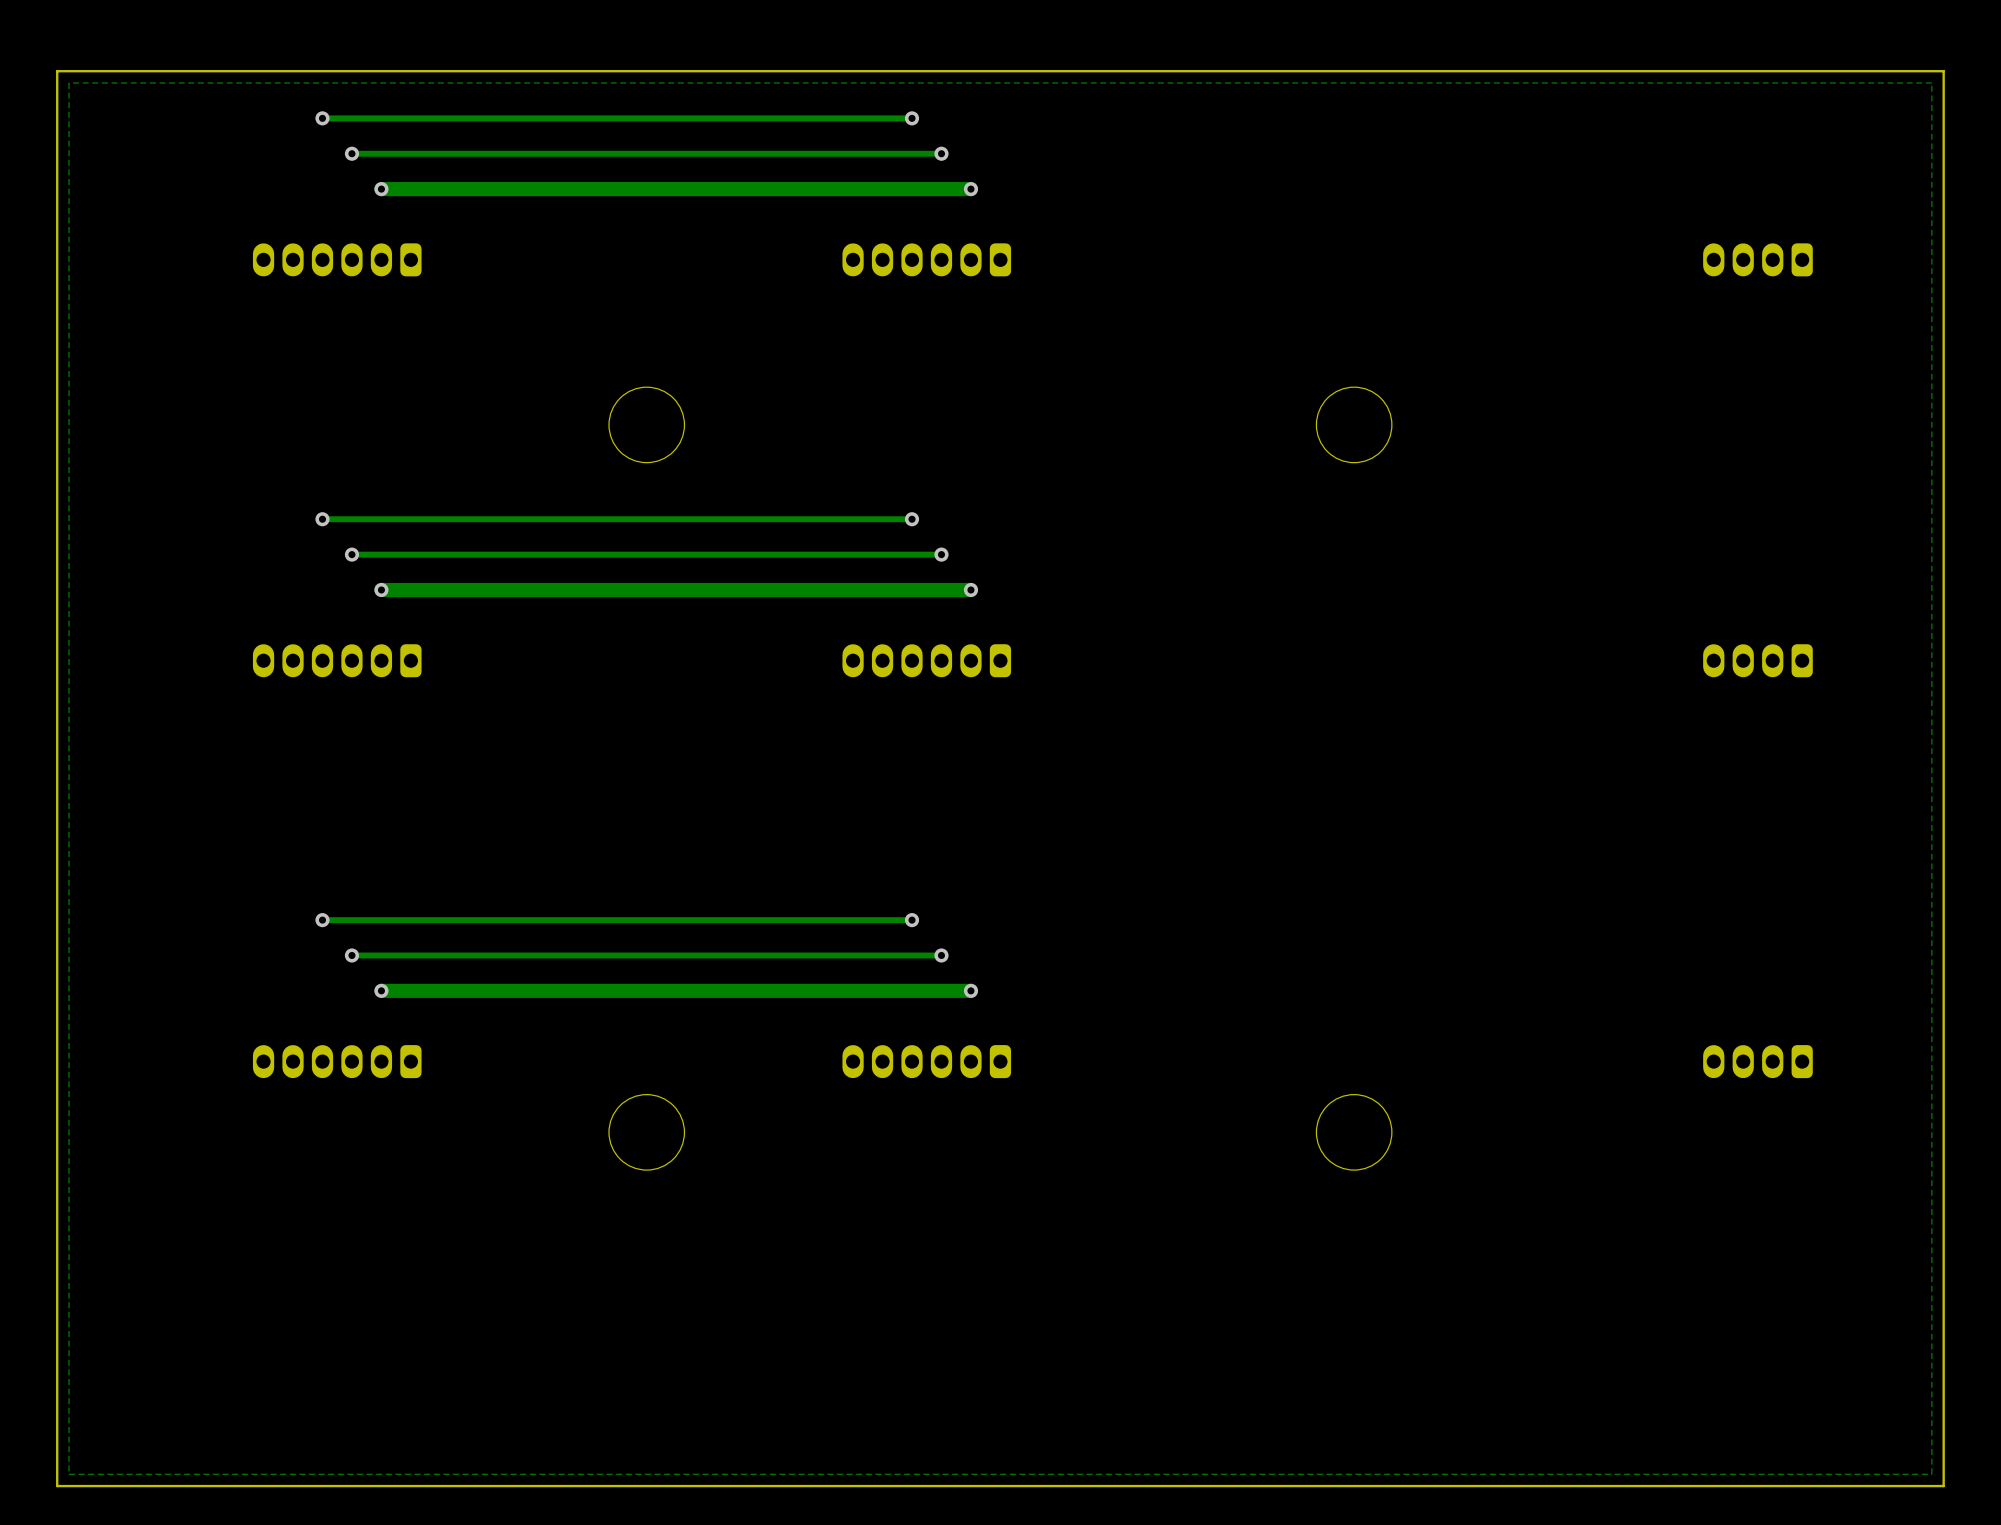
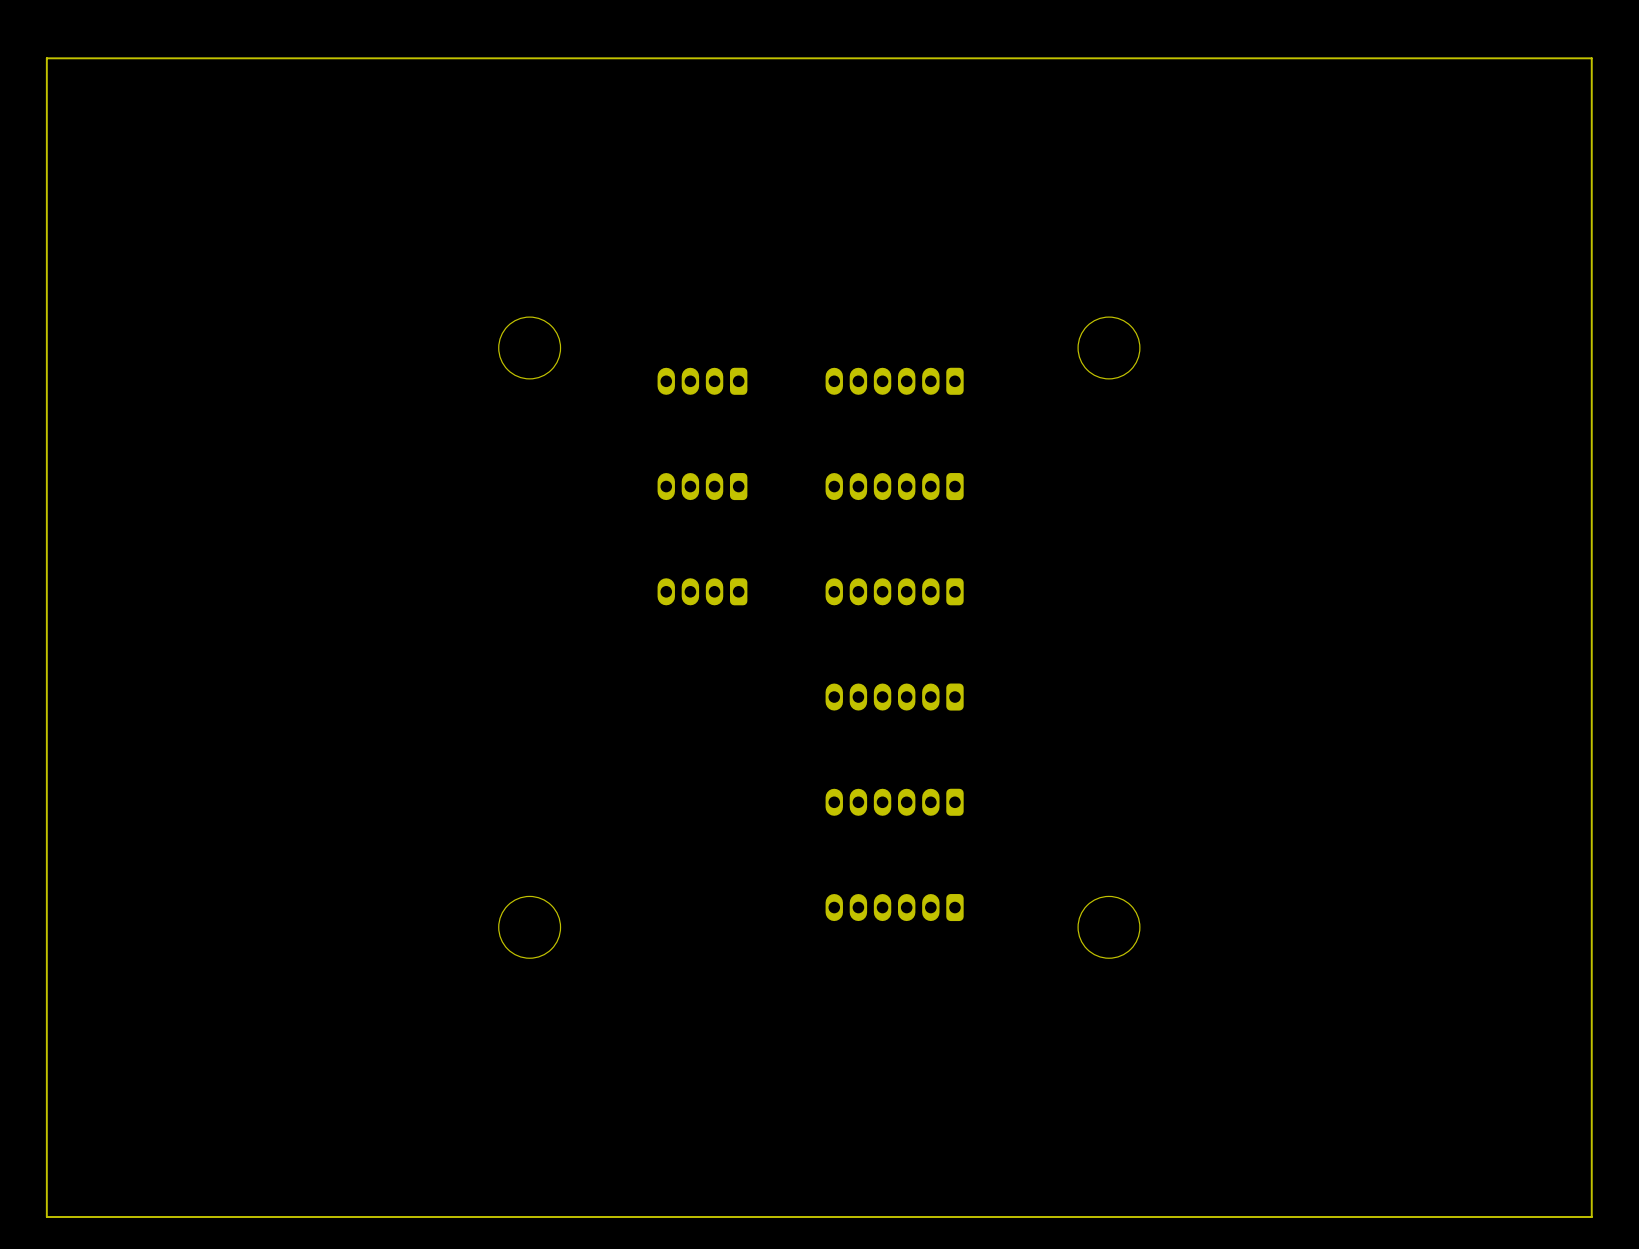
zone outline: (1931, 82) (68, 82) (68, 1474) (1931, 1474) (1931, 82) -> none
via: (322, 118) -> none
track: (912, 118) (322, 118) -> none
via: (912, 118) -> none
via: (351, 153) -> none
track: (941, 153) (351, 153) -> none
via: (941, 153) -> none
via: (381, 189) -> none
track: (970, 189) (381, 189) -> none
via: (970, 189) -> none
part: (337, 259) -> none
part: (926, 259) -> none
part: (1757, 259) -> none
part: none -> (702, 381)
part: none -> (894, 381)
via: (322, 519) -> none
track: (912, 519) (322, 519) -> none
via: (912, 519) -> none
via: (351, 554) -> none
track: (941, 554) (351, 554) -> none
via: (941, 554) -> none
via: (381, 589) -> none
track: (970, 589) (381, 589) -> none
via: (970, 589) -> none
part: none -> (702, 486)
part: none -> (894, 486)
part: (337, 660) -> none
part: (926, 660) -> none
part: (1757, 660) -> none
part: none -> (702, 591)
part: none -> (894, 591)
part: none -> (894, 697)
via: (322, 920) -> none
track: (912, 920) (322, 920) -> none
via: (912, 920) -> none
via: (351, 955) -> none
track: (941, 955) (351, 955) -> none
via: (941, 955) -> none
part: none -> (894, 802)
via: (381, 990) -> none
track: (970, 990) (381, 990) -> none
via: (970, 990) -> none
part: (337, 1061) -> none
part: (926, 1061) -> none
part: (1757, 1061) -> none
part: none -> (894, 907)

